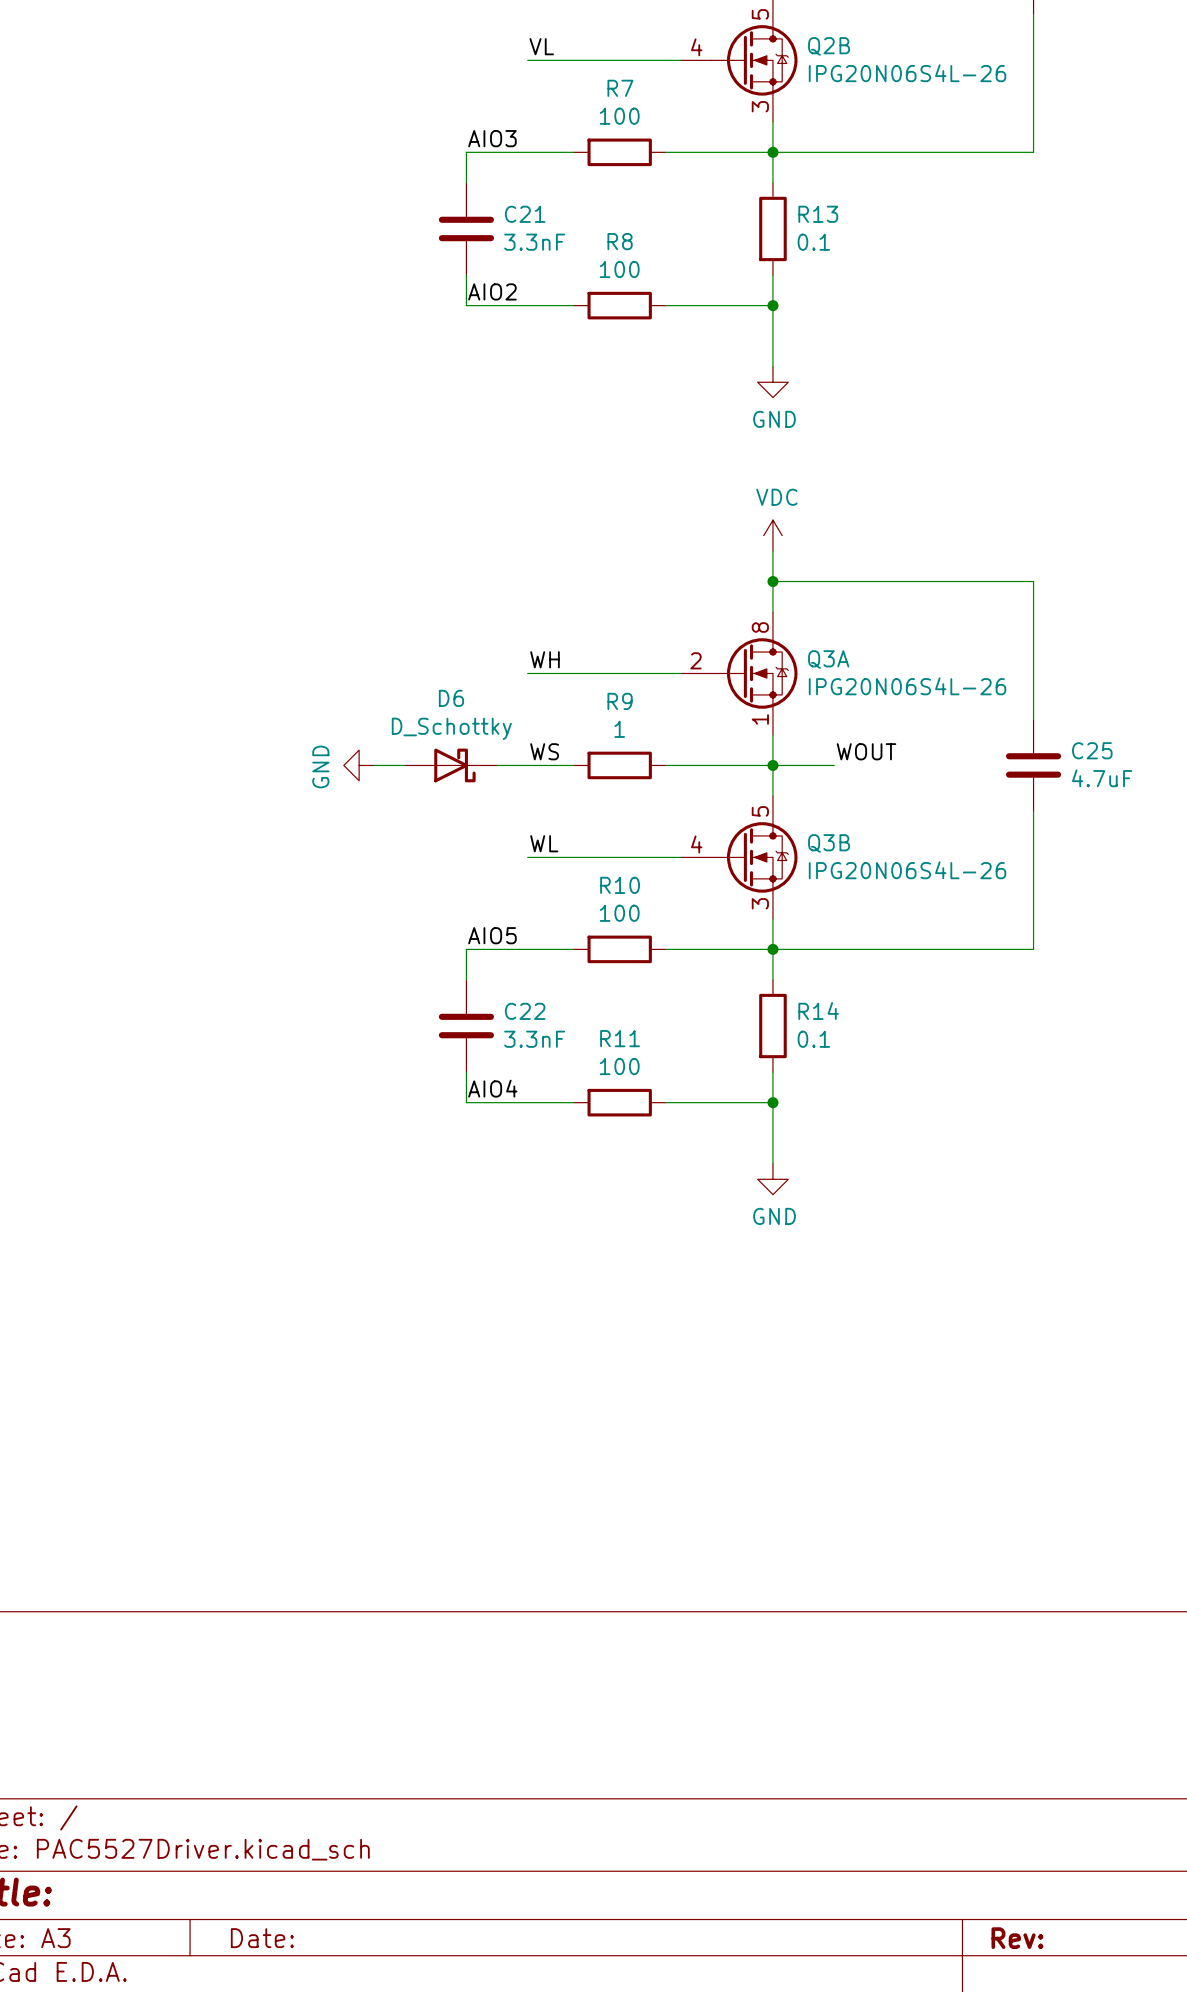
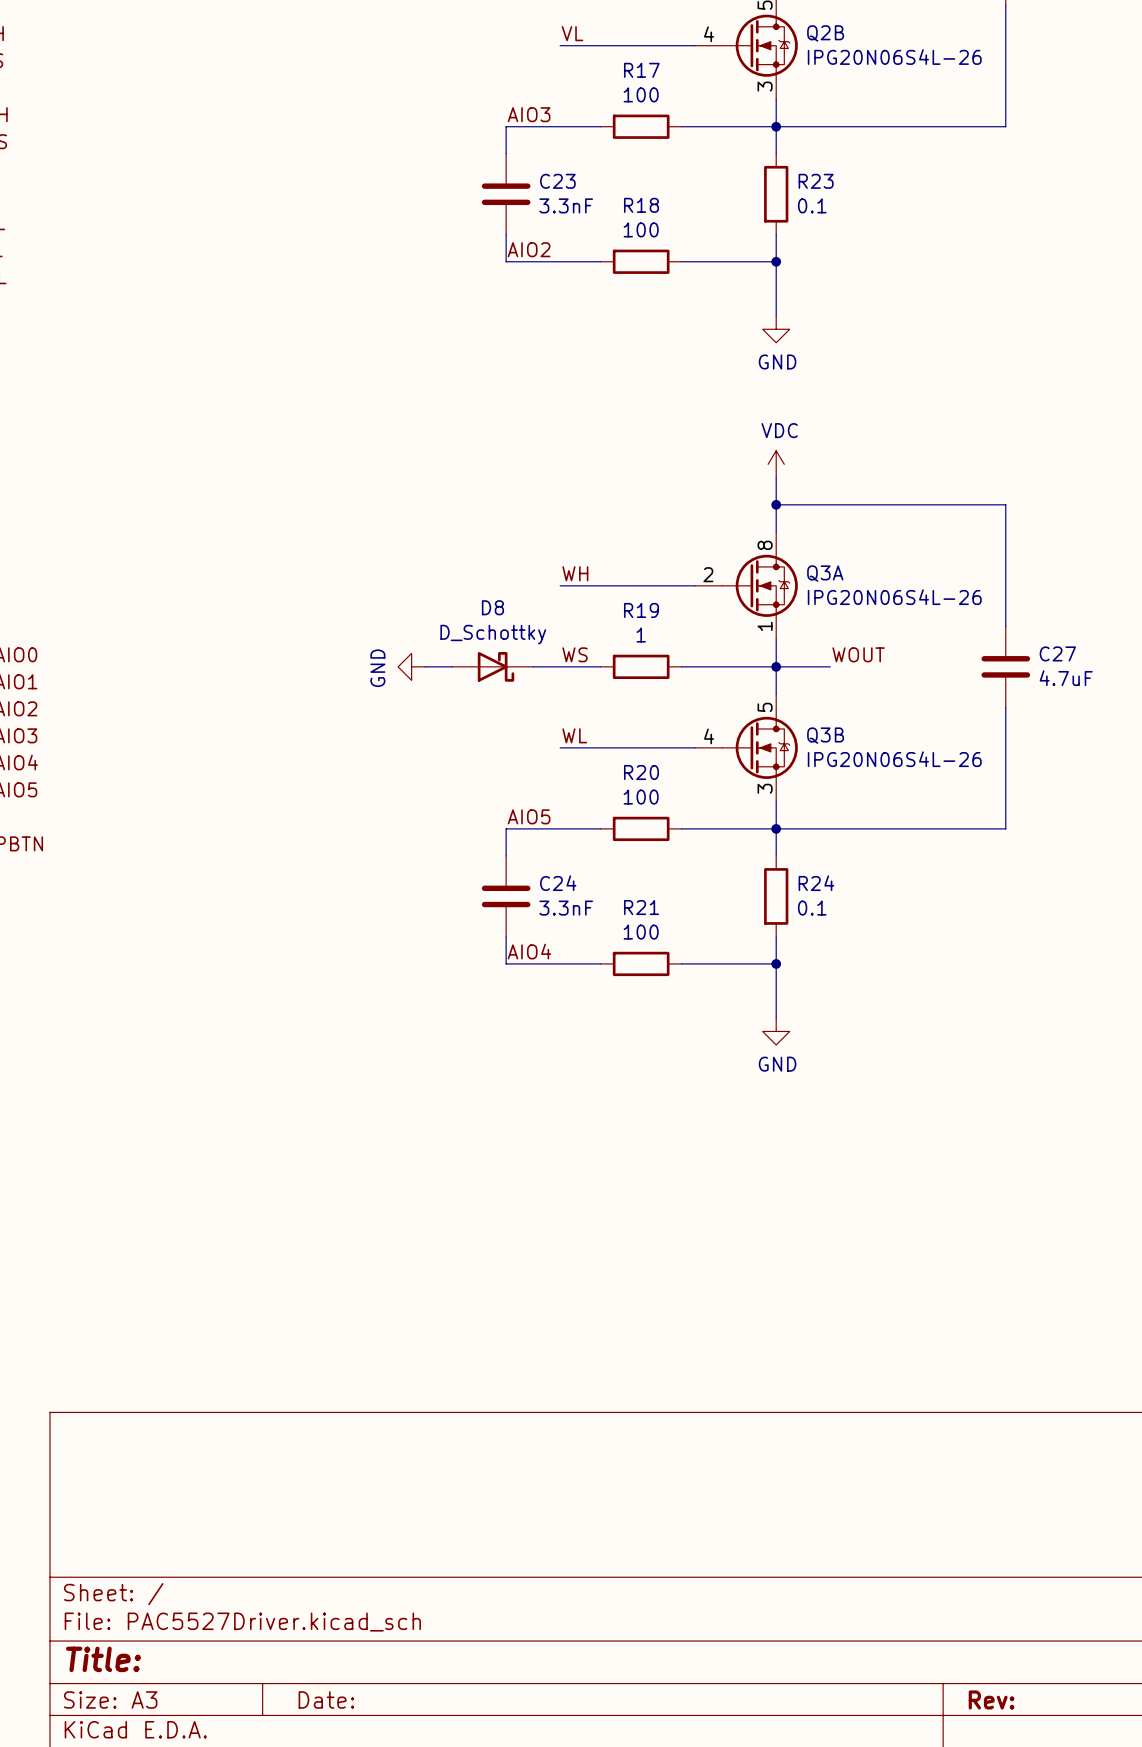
R7 name: R7 (620, 88) -> R17 (641, 70)
C21 name: C21 (525, 214) -> C23 (557, 181)
R13 name: R13 (818, 214) -> R23 (816, 181)
R8 name: R8 (620, 241) -> R18 (641, 205)
D6 name: D6 (451, 698) -> D8 (492, 607)
R9 name: R9 (620, 701) -> R19 (641, 610)
C25 name: C25 (1092, 750) -> C27 (1057, 653)
R10 name: R10 (620, 885) -> R20 (641, 772)
R14 name: R14 (818, 1010) -> R24 (816, 883)
C22 name: C22 (525, 1011) -> C24 (558, 883)
R11 name: R11 (620, 1038) -> R21 (641, 907)

